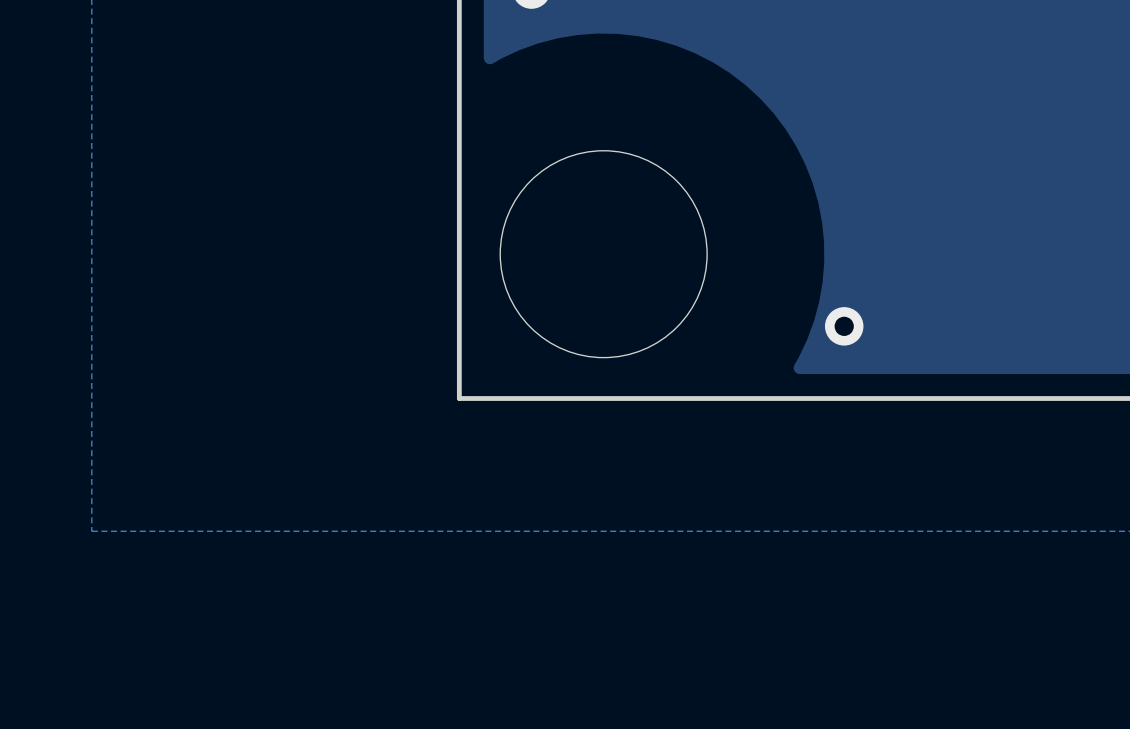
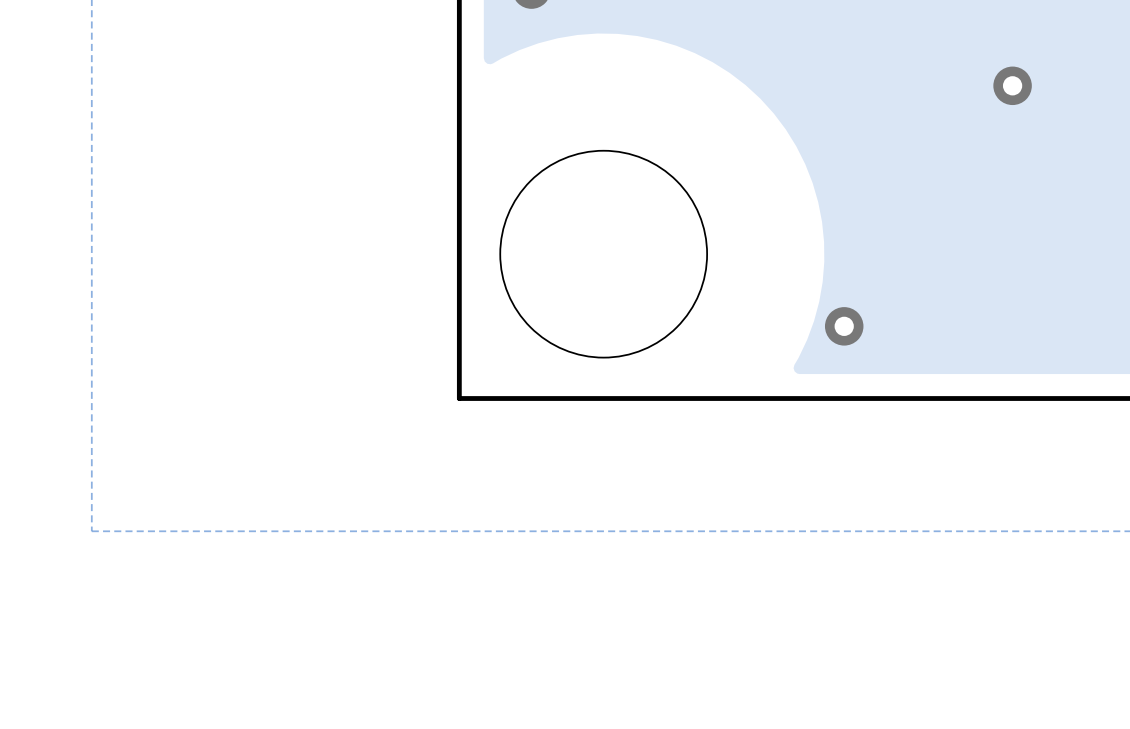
via: none -> (1012, 85)

